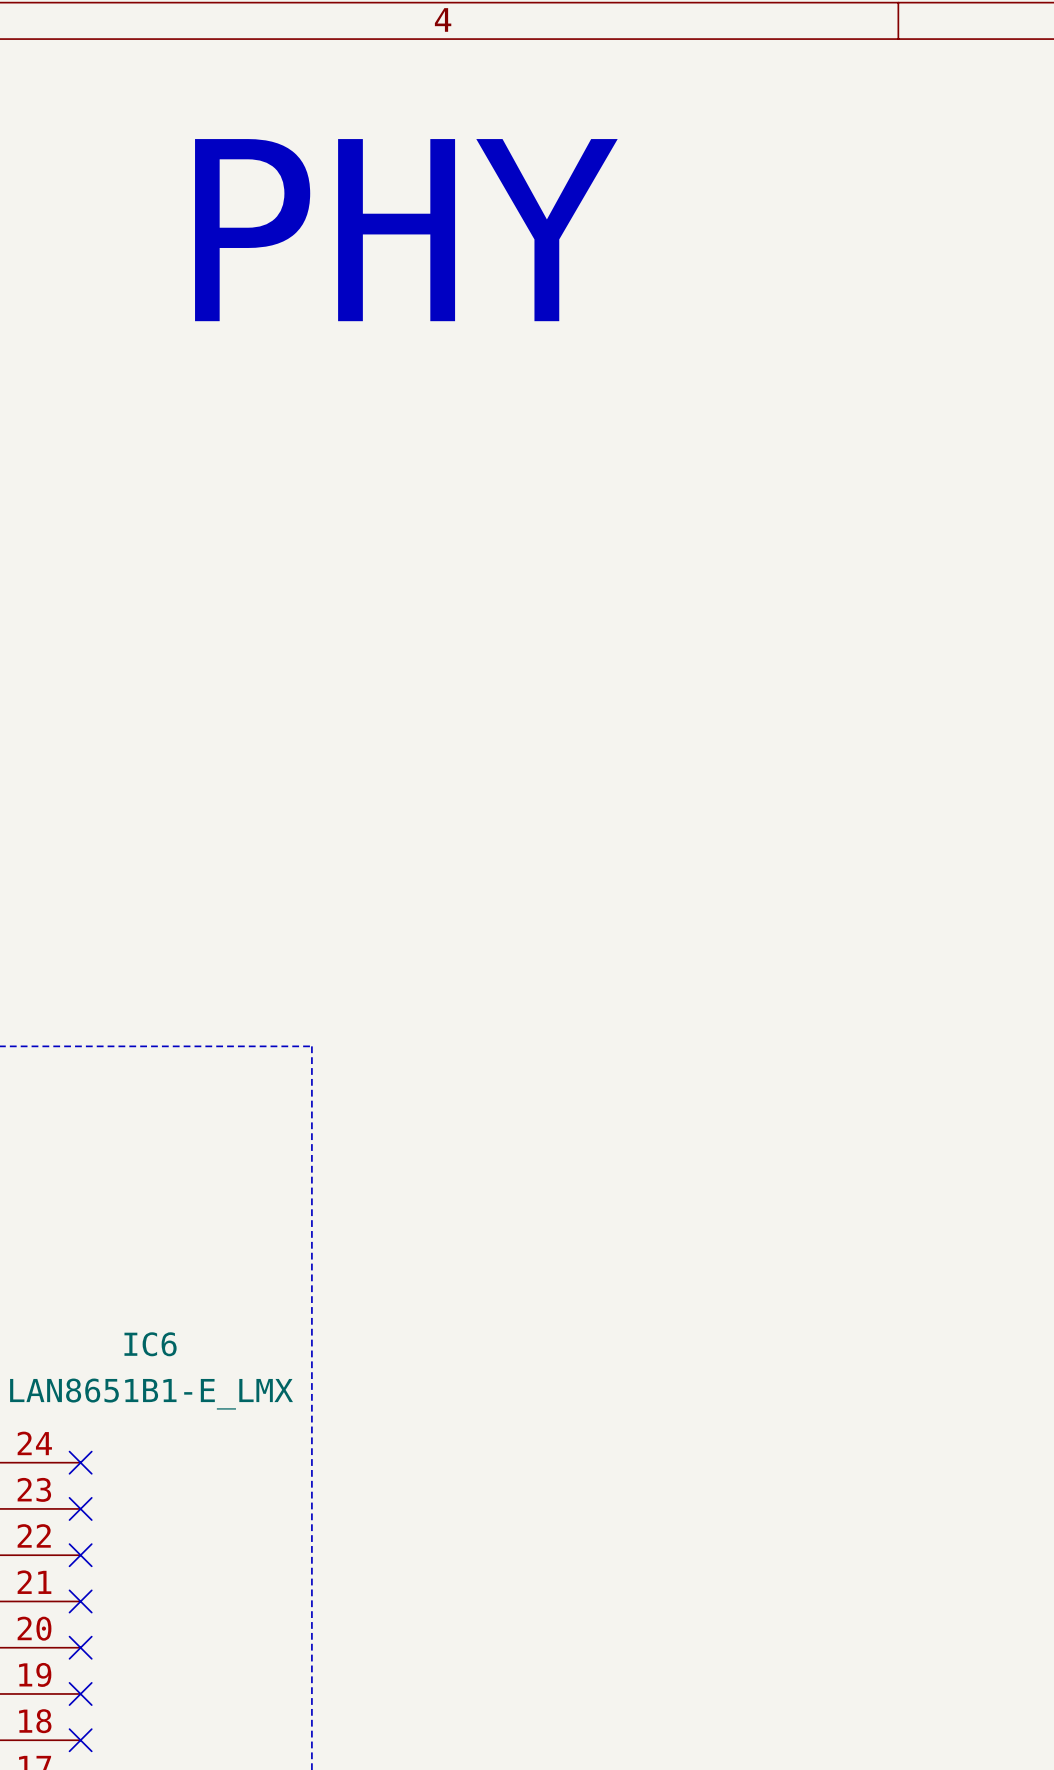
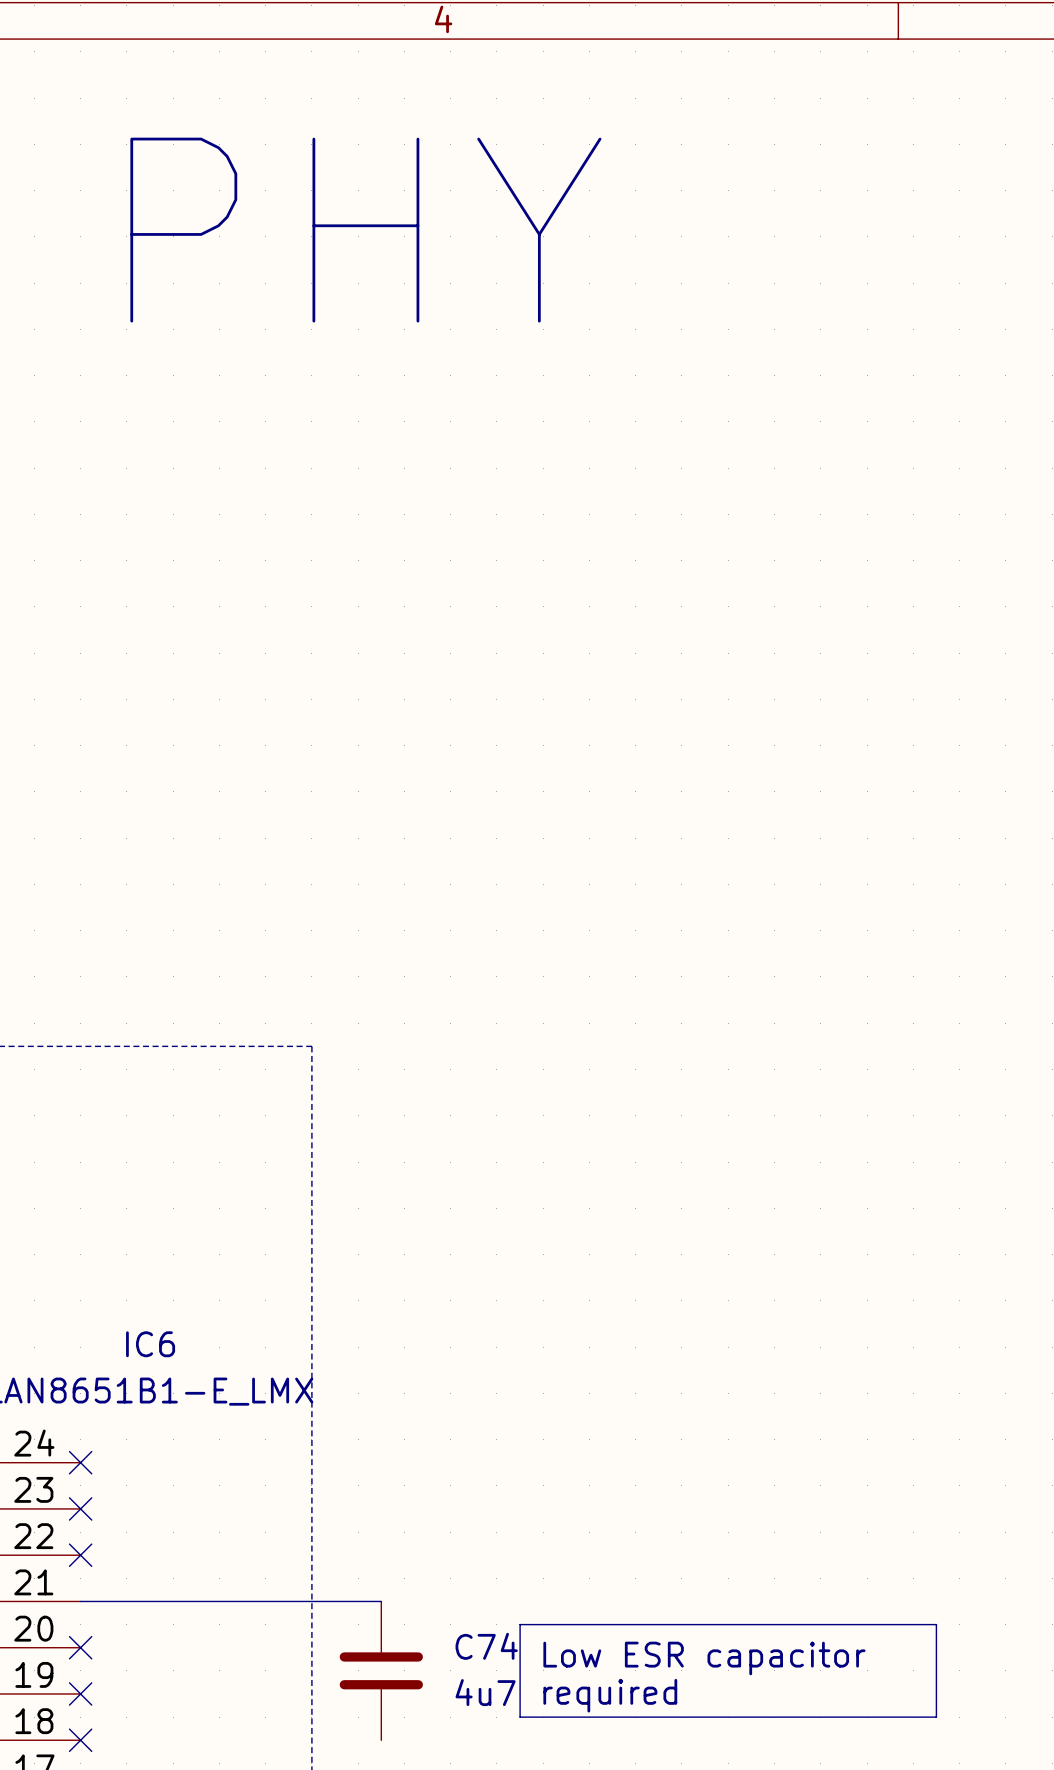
wire: none -> (80, 1601) (381, 1601)
no-connect mark: (80, 1601) -> none
line: none -> (520, 1624) (936, 1624) (936, 1717) (520, 1717) (520, 1624)
text: none -> Low ESR capacitor (704, 1658)
C74: none -> 4u7 (381, 1670)
text: none -> required (610, 1695)

